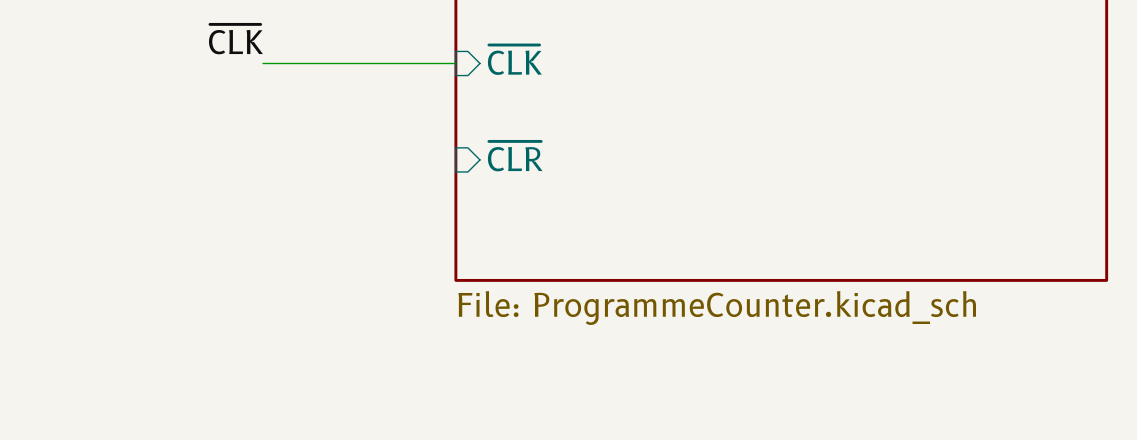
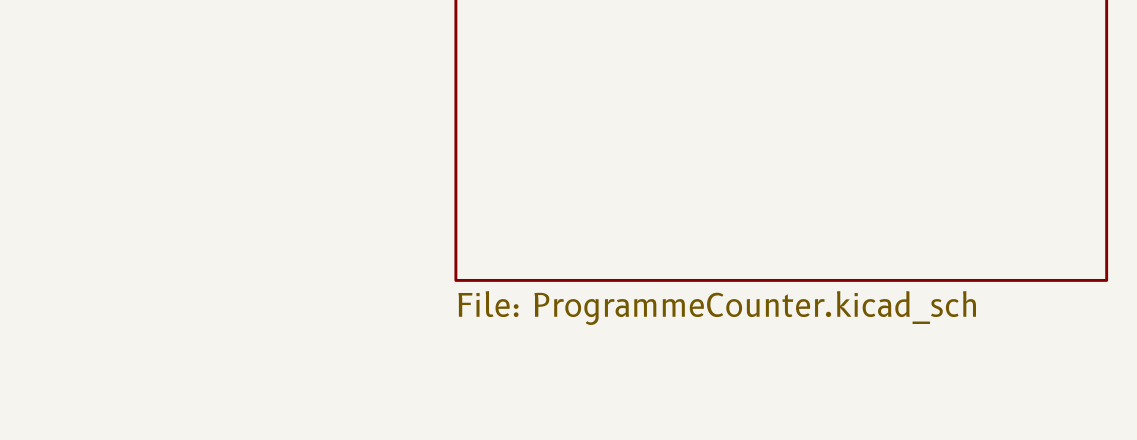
label: ~{CLK} (235, 39) -> none
sheet pin: ~{CLK} (514, 59) -> none
wire: (263, 63) (455, 63) -> none
sheet pin: ~{CLR} (515, 156) -> none

